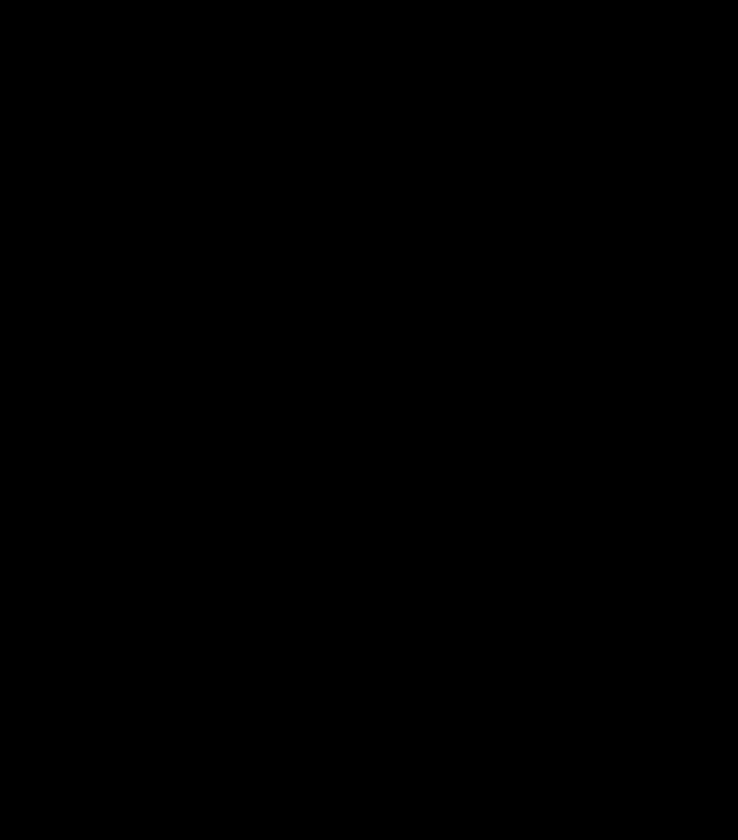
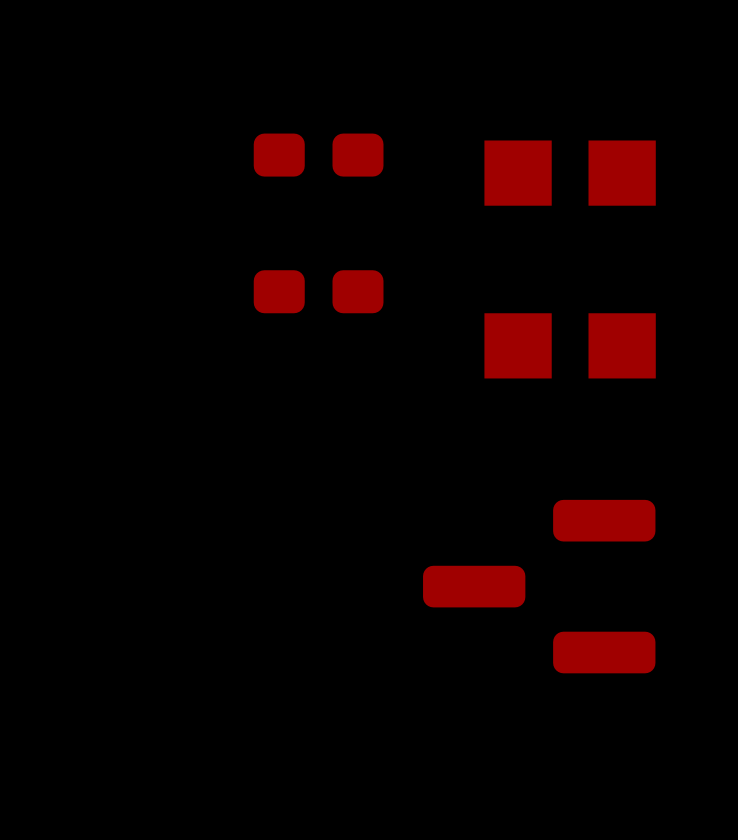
part: none -> (318, 155)
part: none -> (570, 173)
part: none -> (318, 291)
part: none -> (570, 345)
part: none -> (539, 586)

